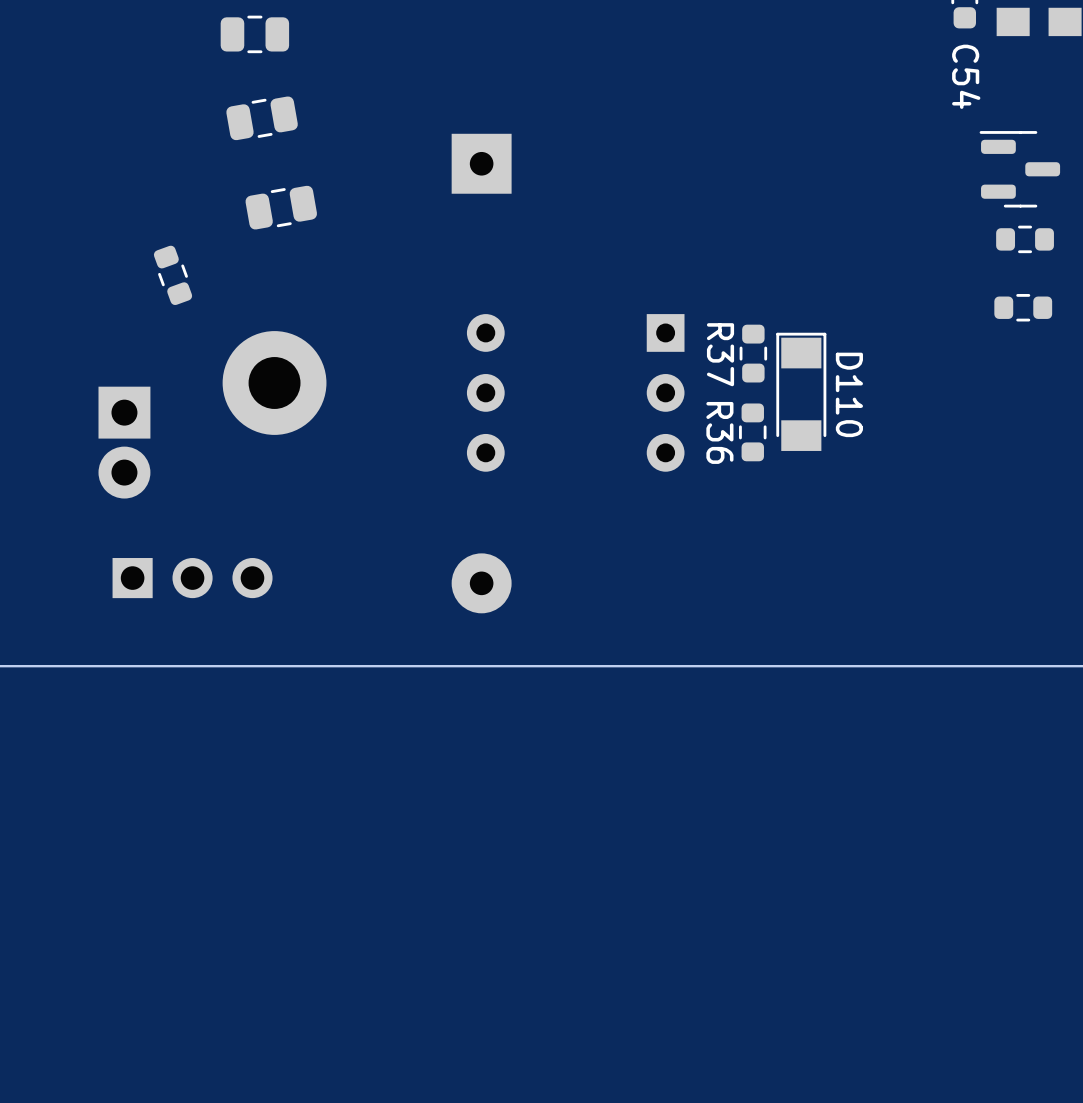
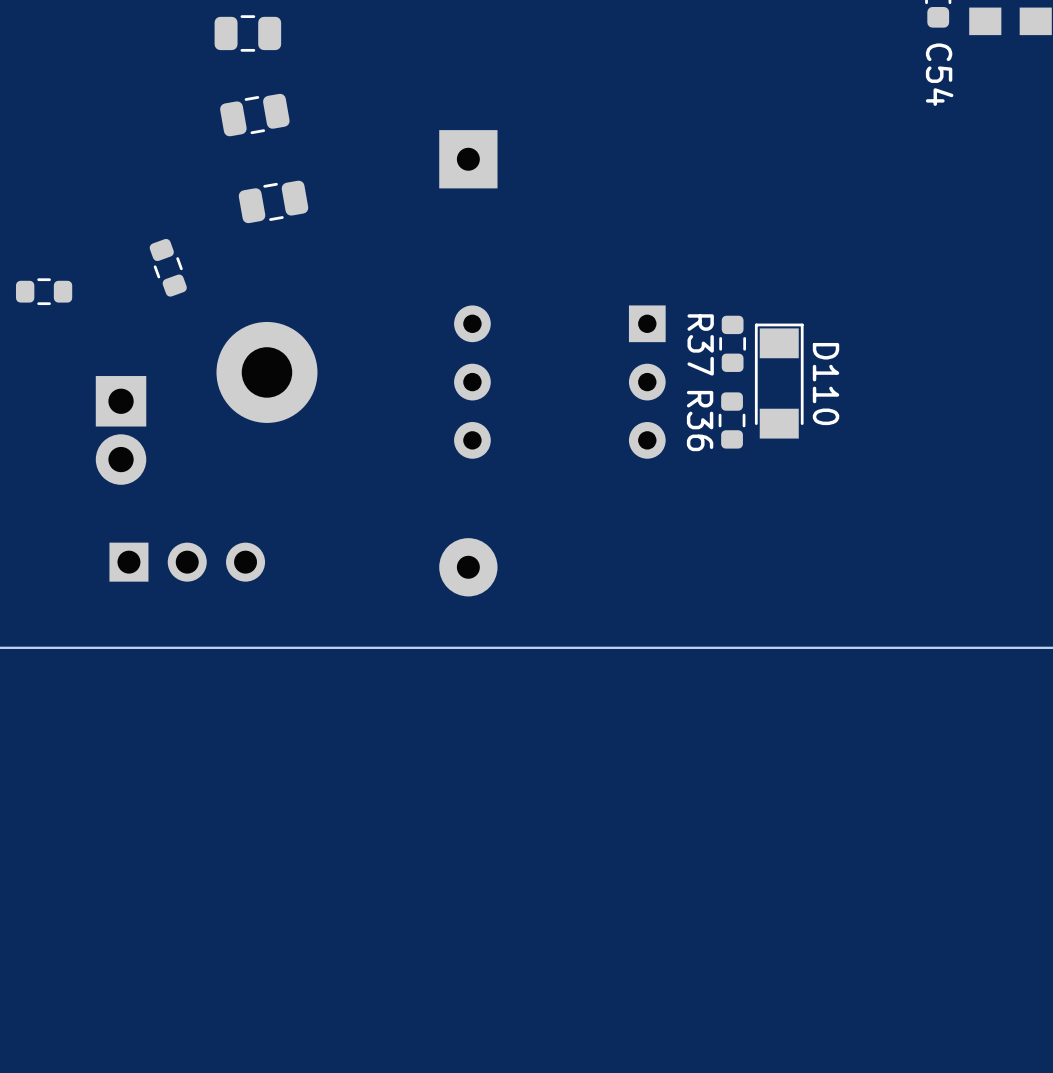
part: (1019, 169) -> none
part: (1025, 239) -> none
part: none -> (44, 291)
part: (1023, 307) -> none

